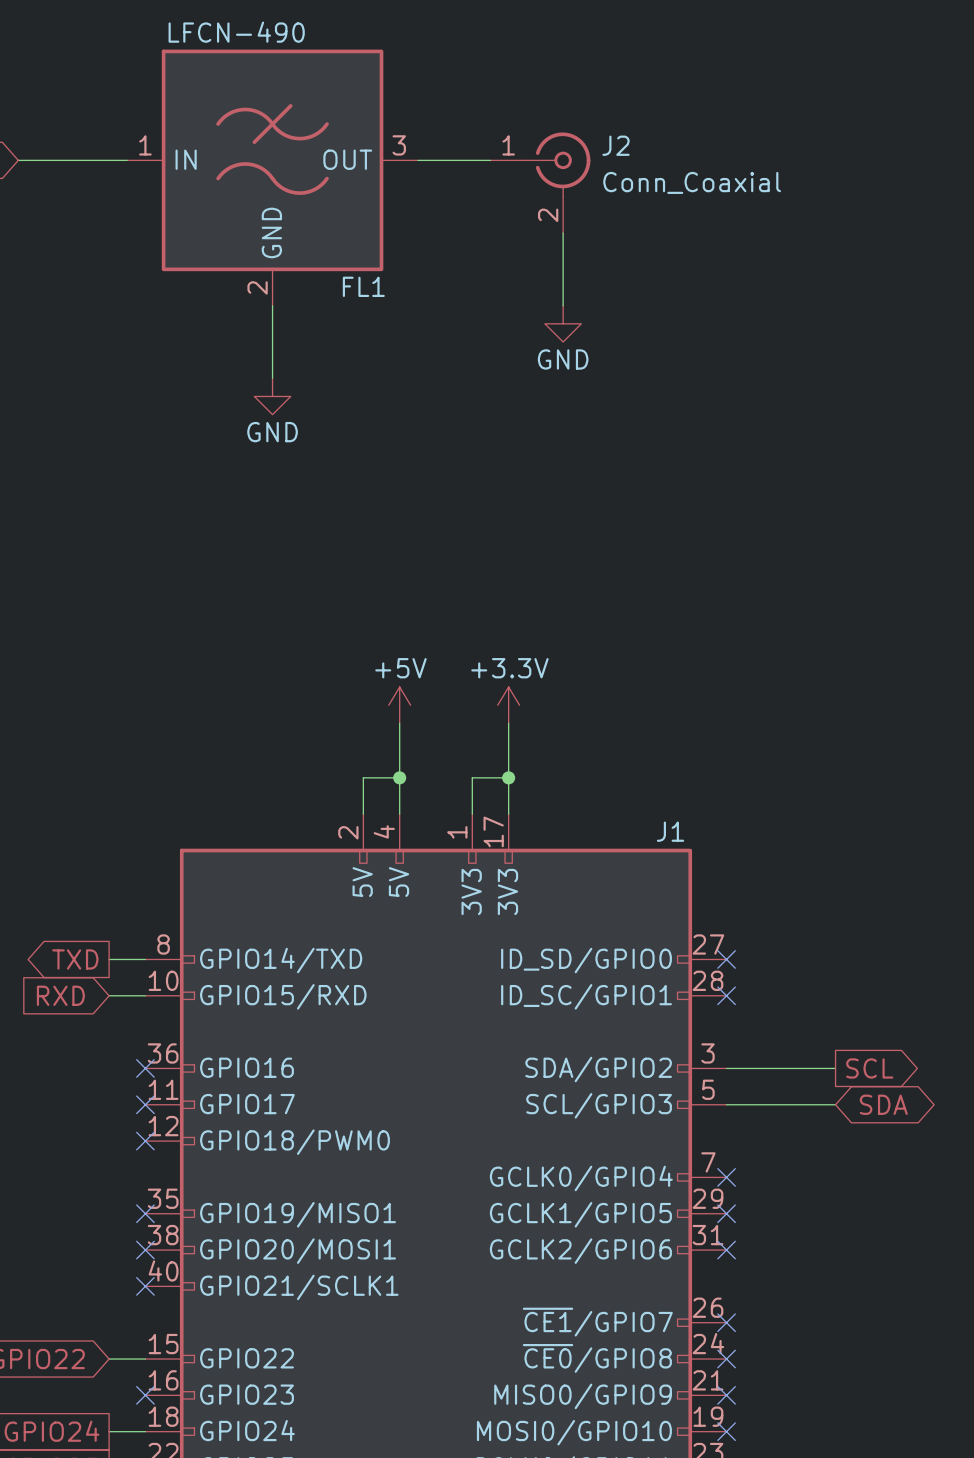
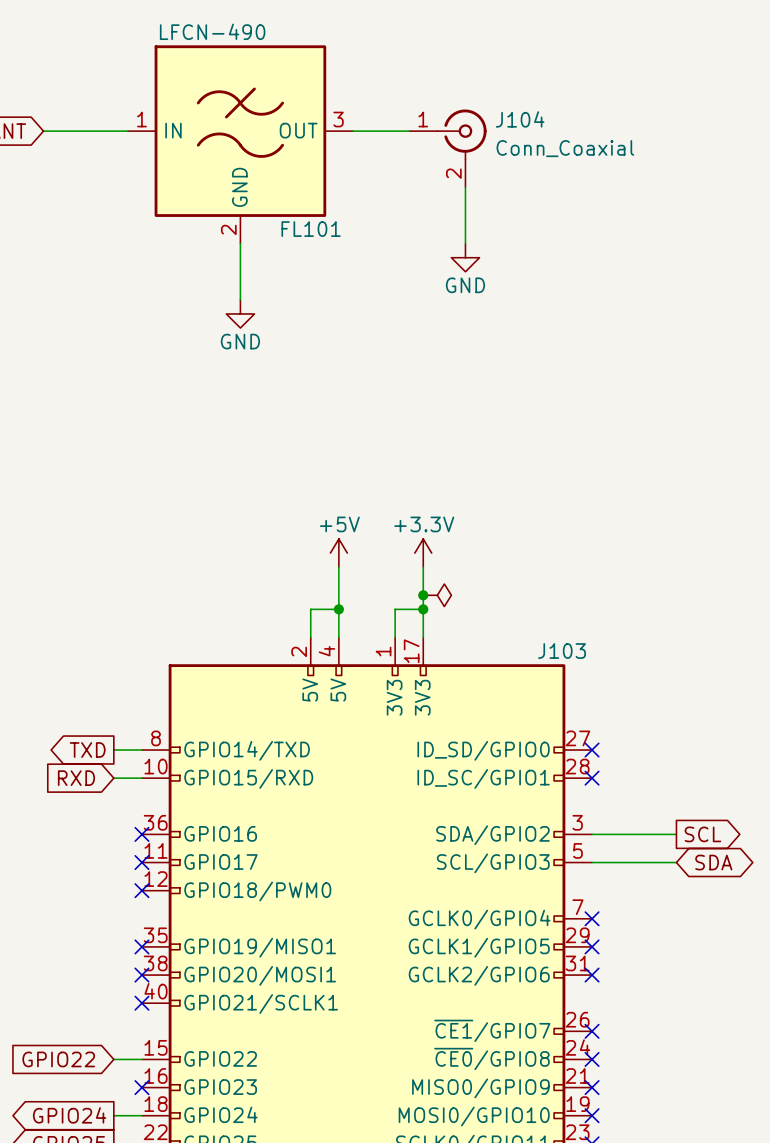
J2 name: J2 (616, 145) -> J104 (520, 119)
FL1 name: FL1 (363, 286) -> FL101 (311, 229)
junction: none -> (423, 595)
power symbol: none -> (437, 595)
J1 name: J1 (670, 831) -> J103 (562, 651)

